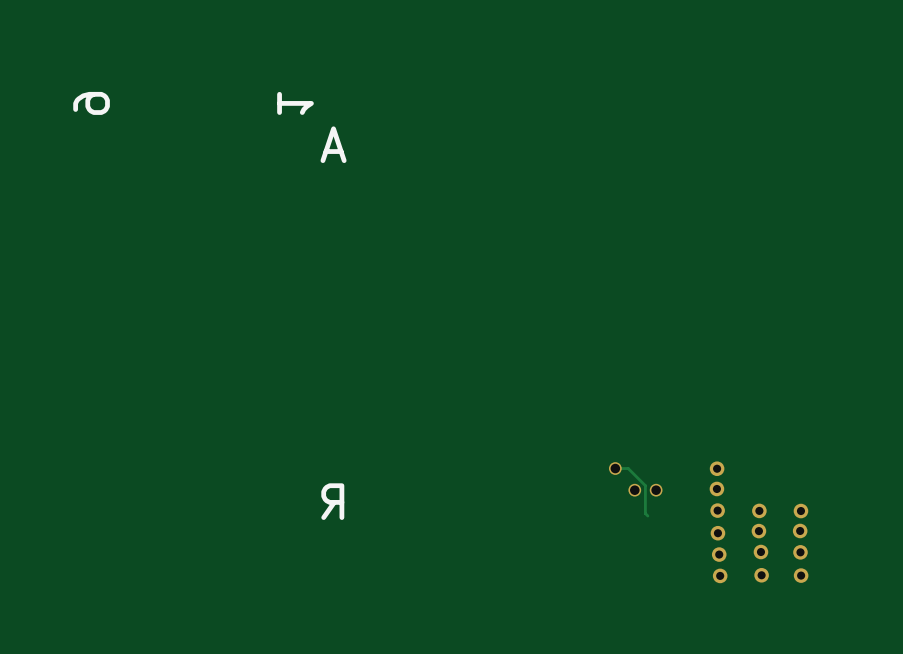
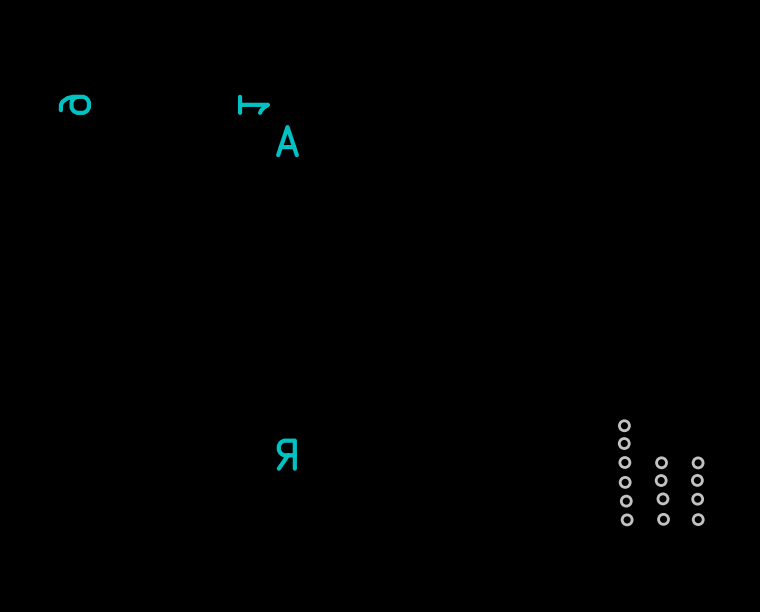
track: (615, 468) (628, 468) (645, 485) (645, 513) (647, 516) -> none
via: (615, 468) -> none
via: (634, 490) -> none
via: (656, 490) -> none

